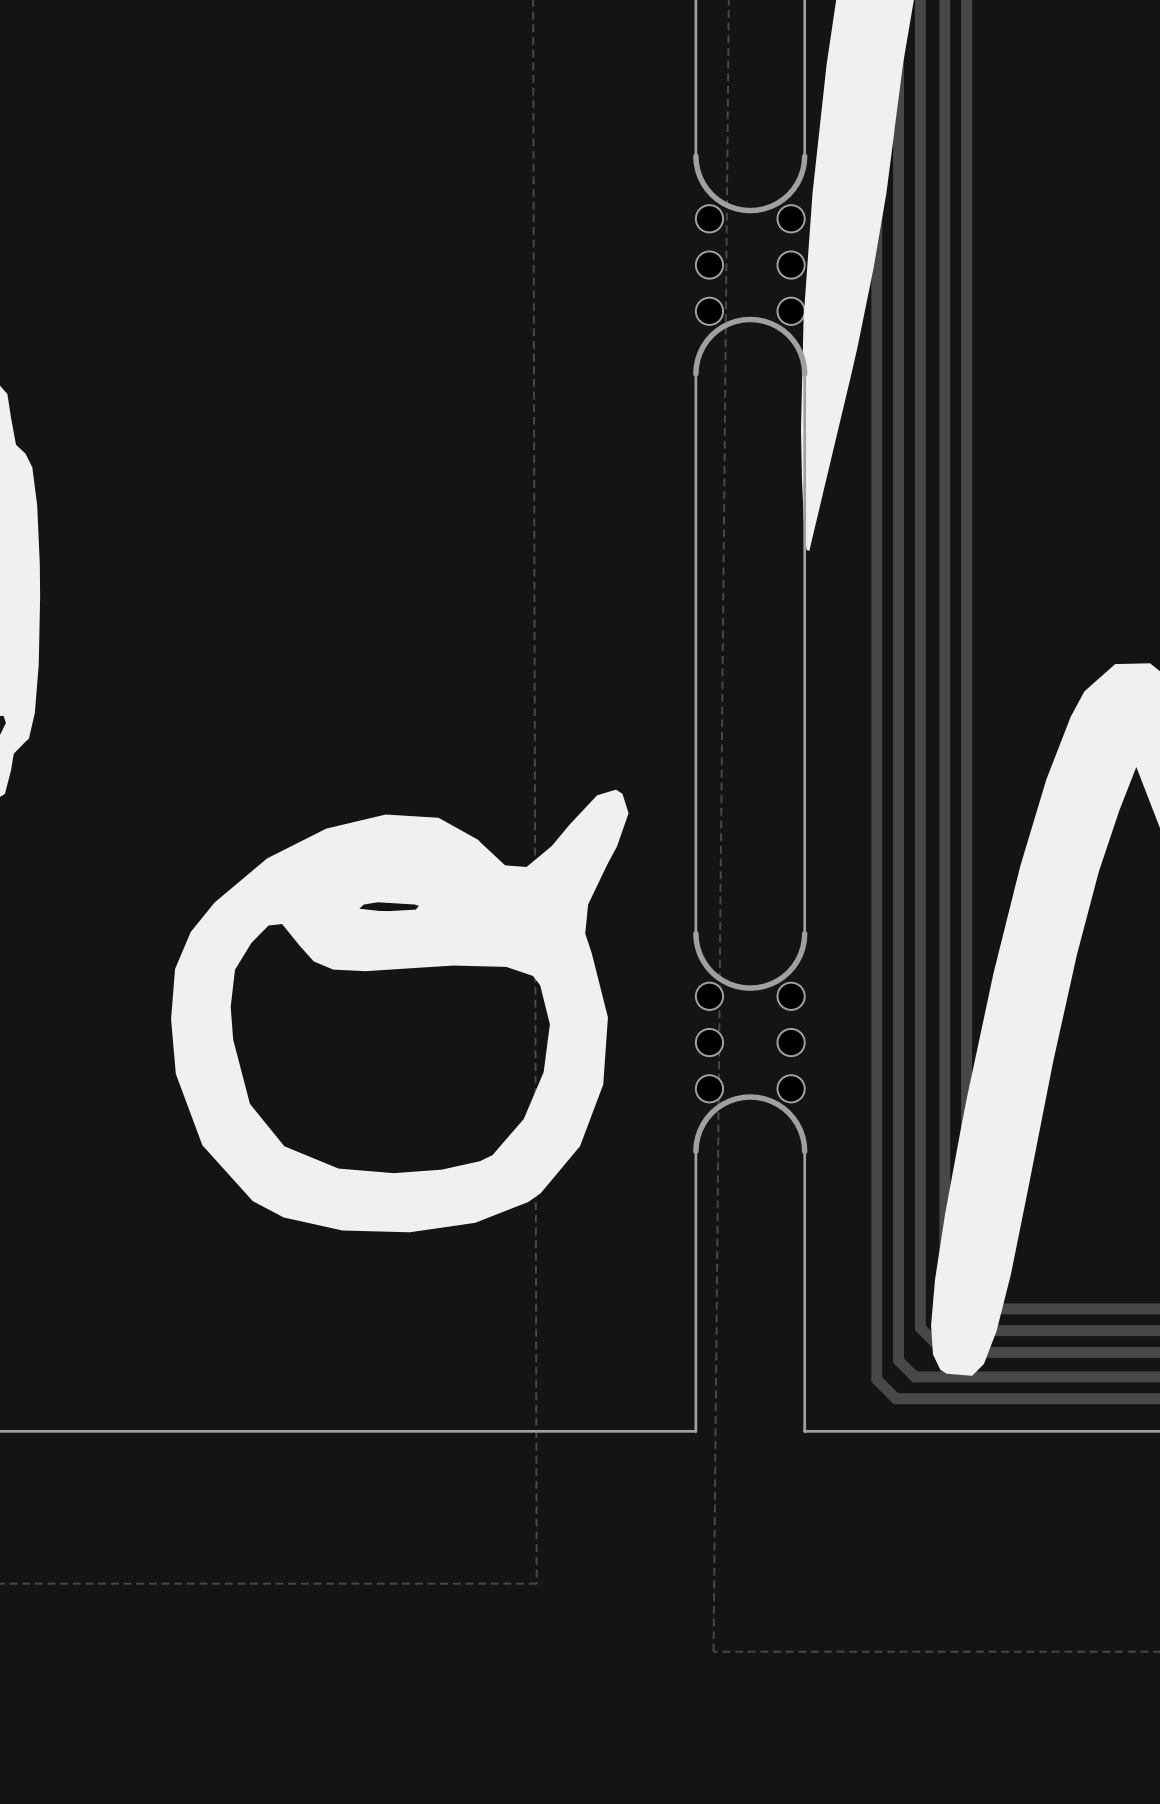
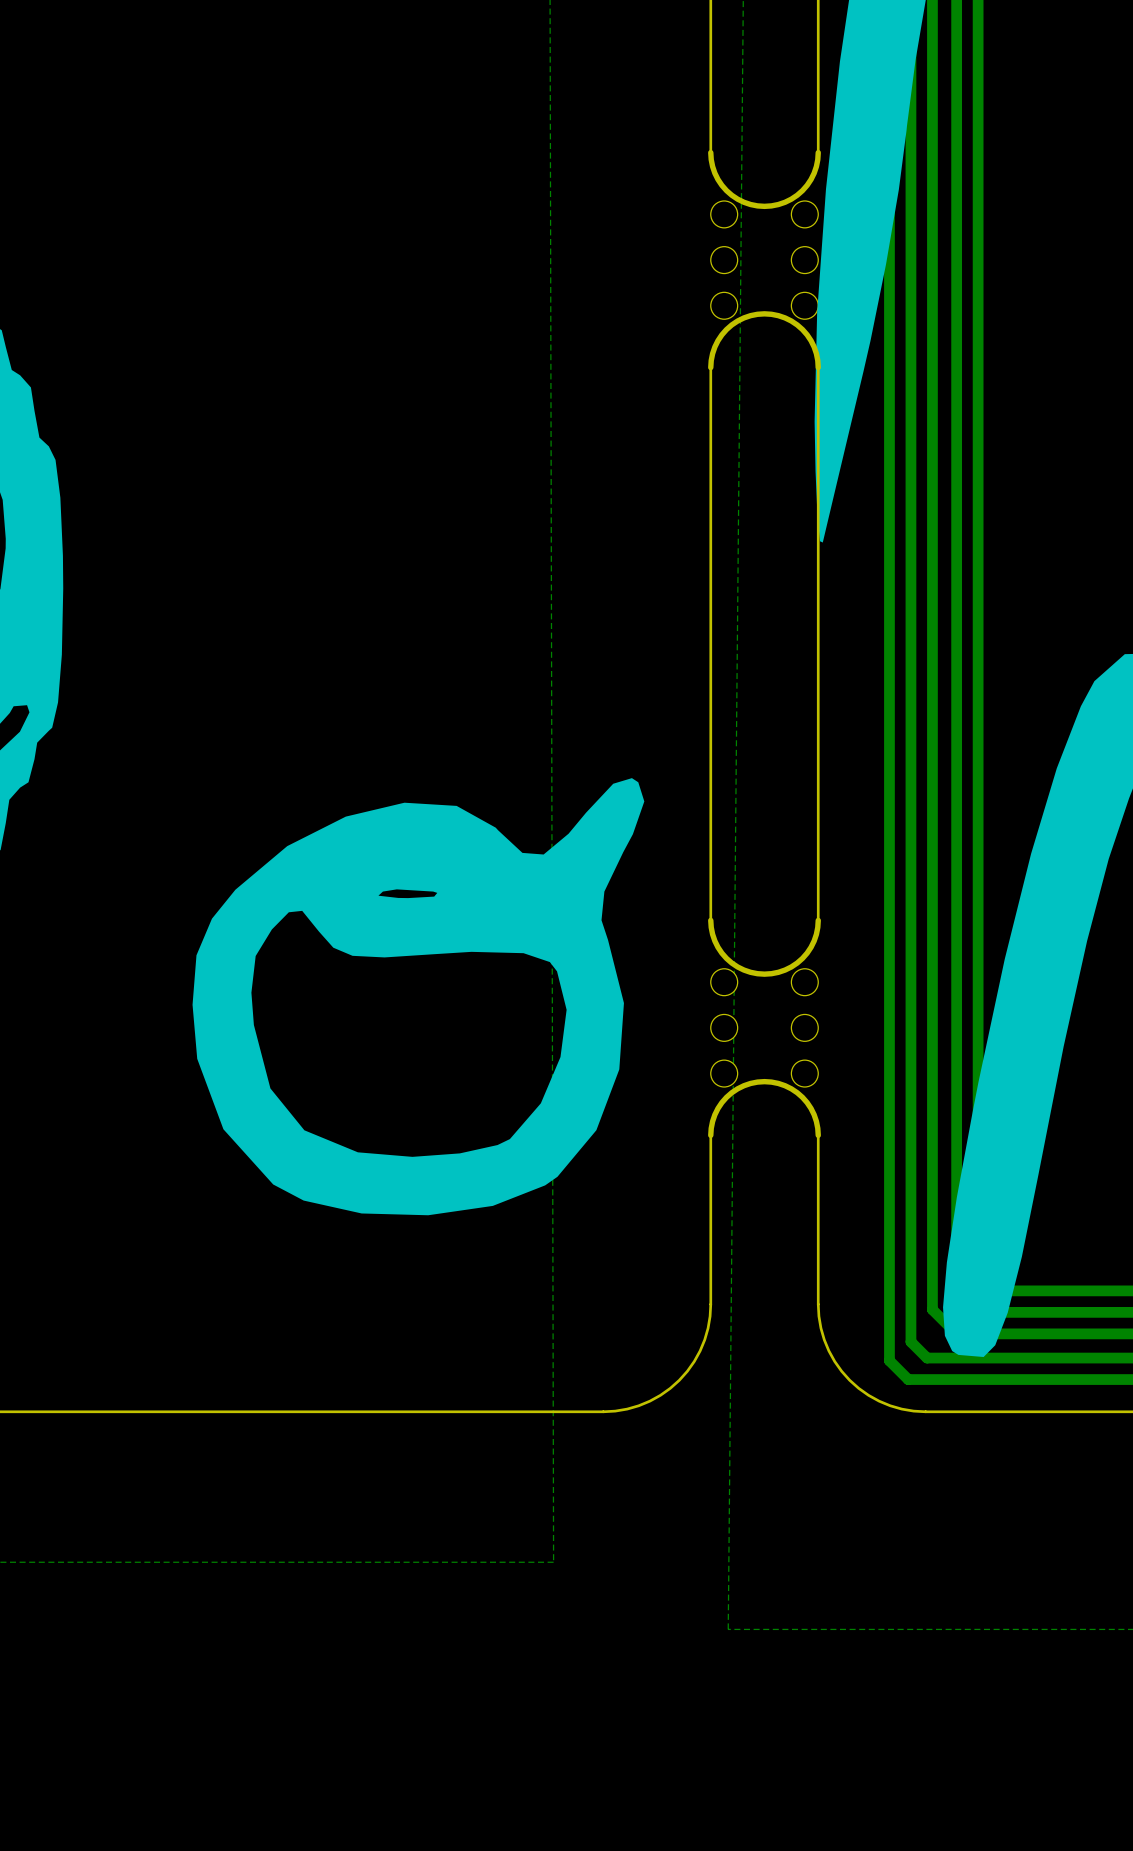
board edge: (695, 1322) (695, 1431) (587, 1431) -> (710, 1304) (704, 1339) (694, 1361) (679, 1380) (649, 1401) (627, 1409) (603, 1411)
board edge: (804, 1322) (804, 1431) (913, 1431) -> (818, 1304) (824, 1339) (834, 1361) (849, 1380) (868, 1395) (890, 1405) (925, 1411)

